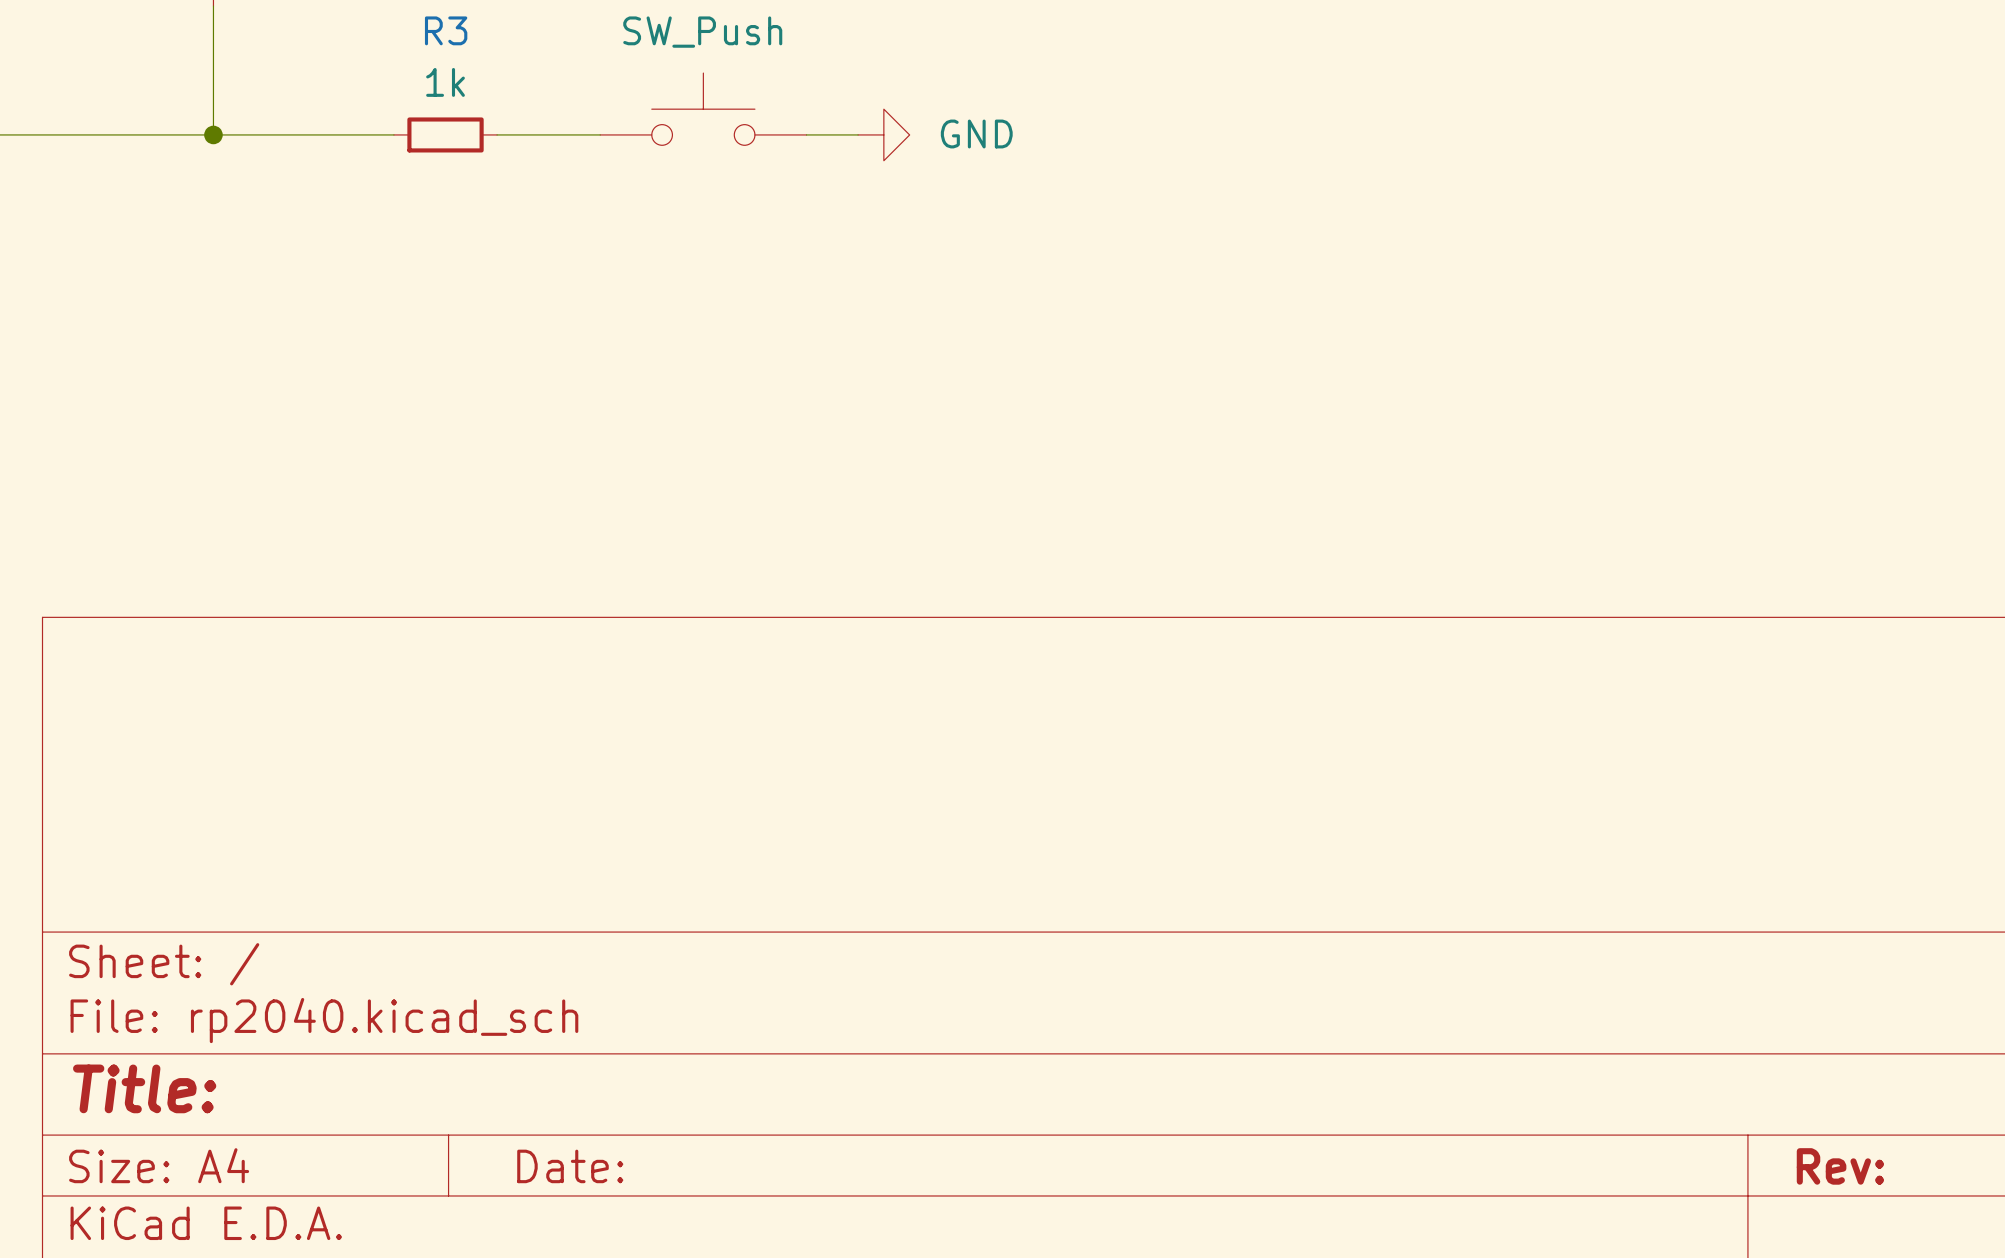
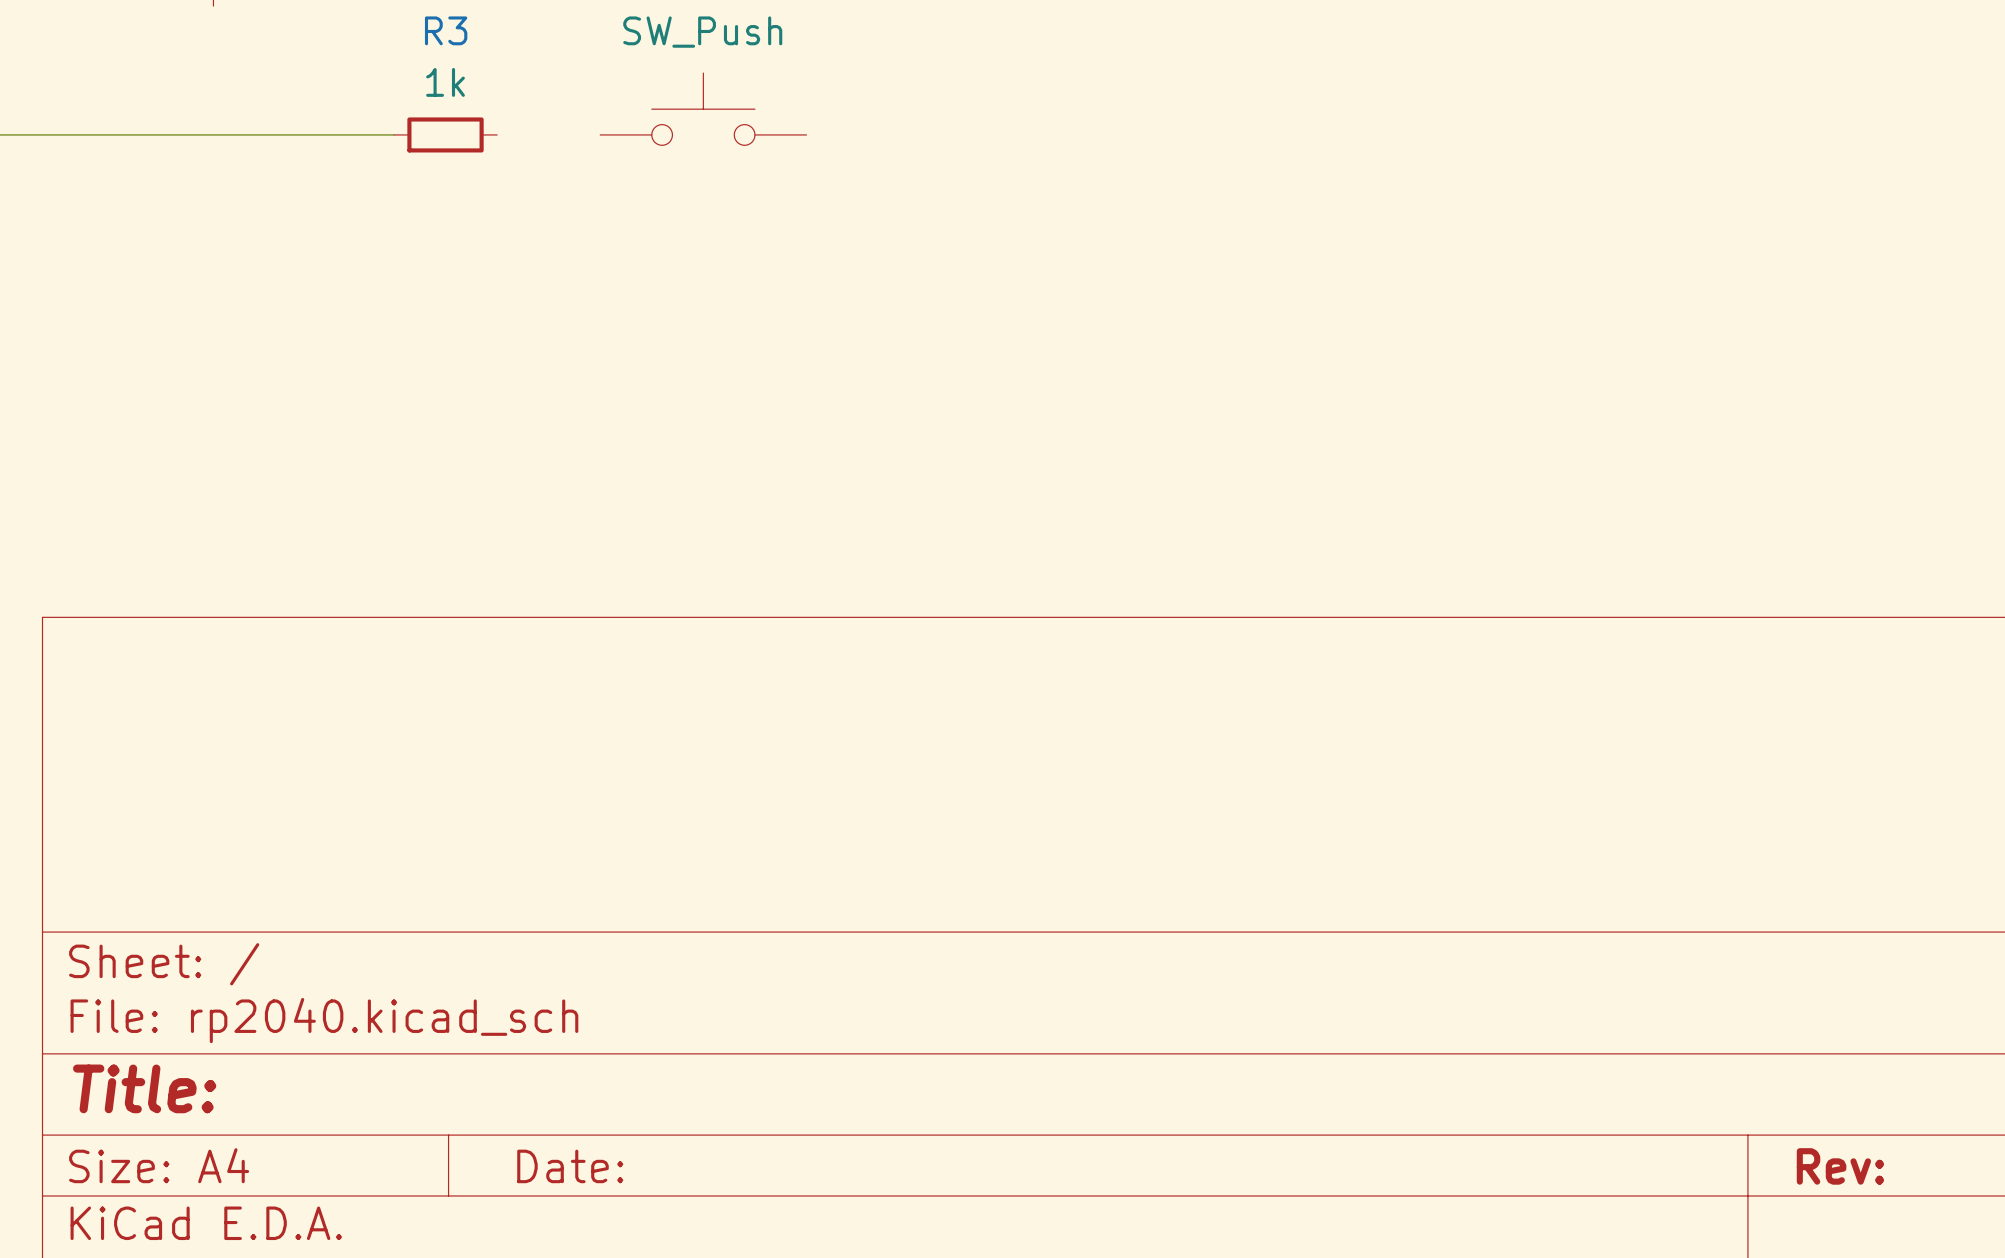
wire: (213, 6) (213, 134) -> none
junction: (213, 134) -> none
wire: (497, 134) (600, 134) -> none
wire: (806, 134) (858, 134) -> none
power symbol: GND (883, 134) -> none

